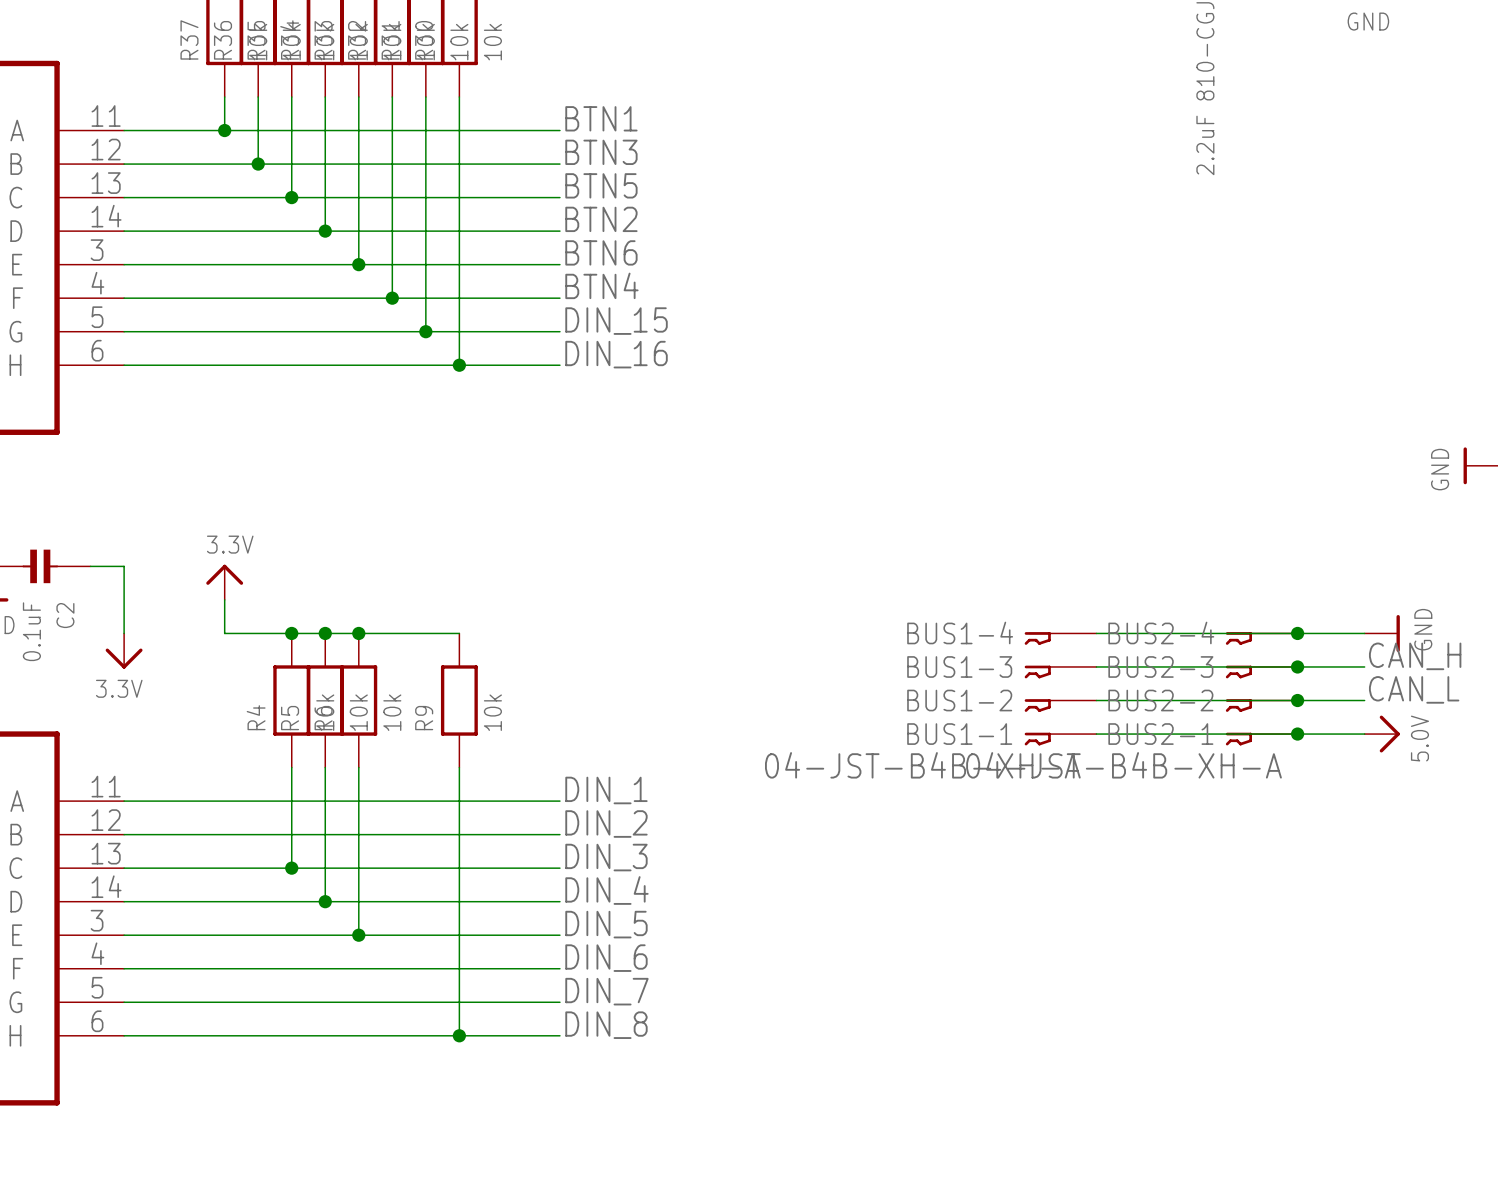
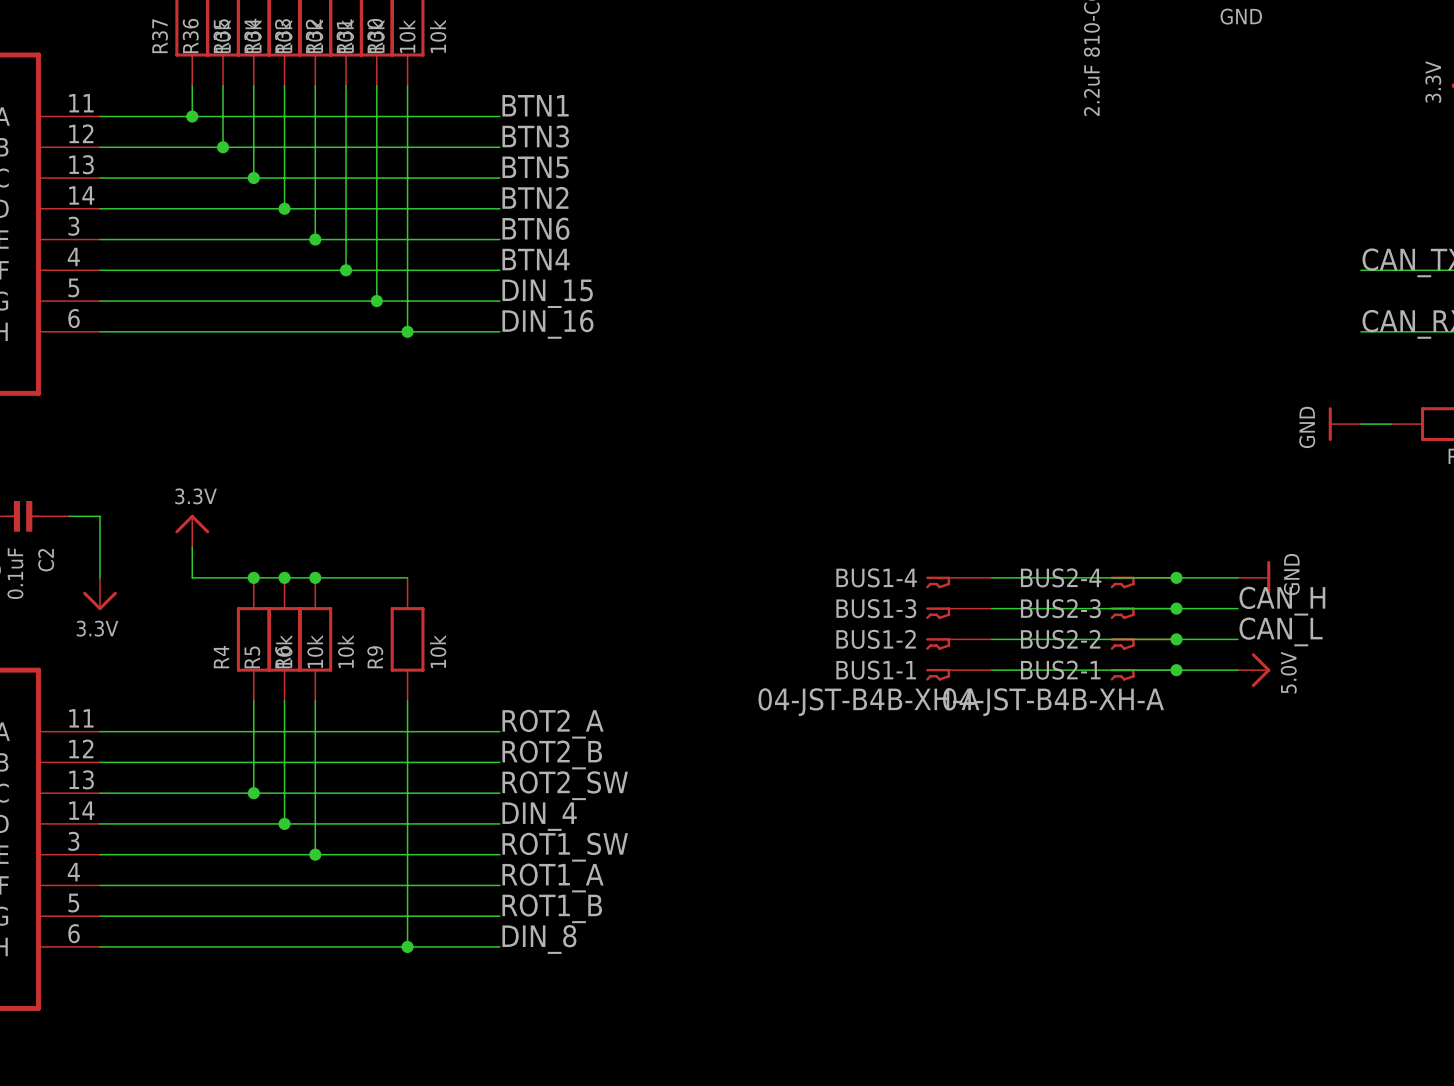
label: DIN_1 (606, 790) -> ROT2_A (553, 724)
label: DIN_2 (606, 824) -> ROT2_B (552, 754)
label: DIN_3 (606, 857) -> ROT2_SW (565, 785)
label: DIN_5 (606, 924) -> ROT1_SW (565, 847)
label: DIN_6 (606, 958) -> ROT1_A (553, 877)
label: DIN_7 (606, 991) -> ROT1_B (552, 908)

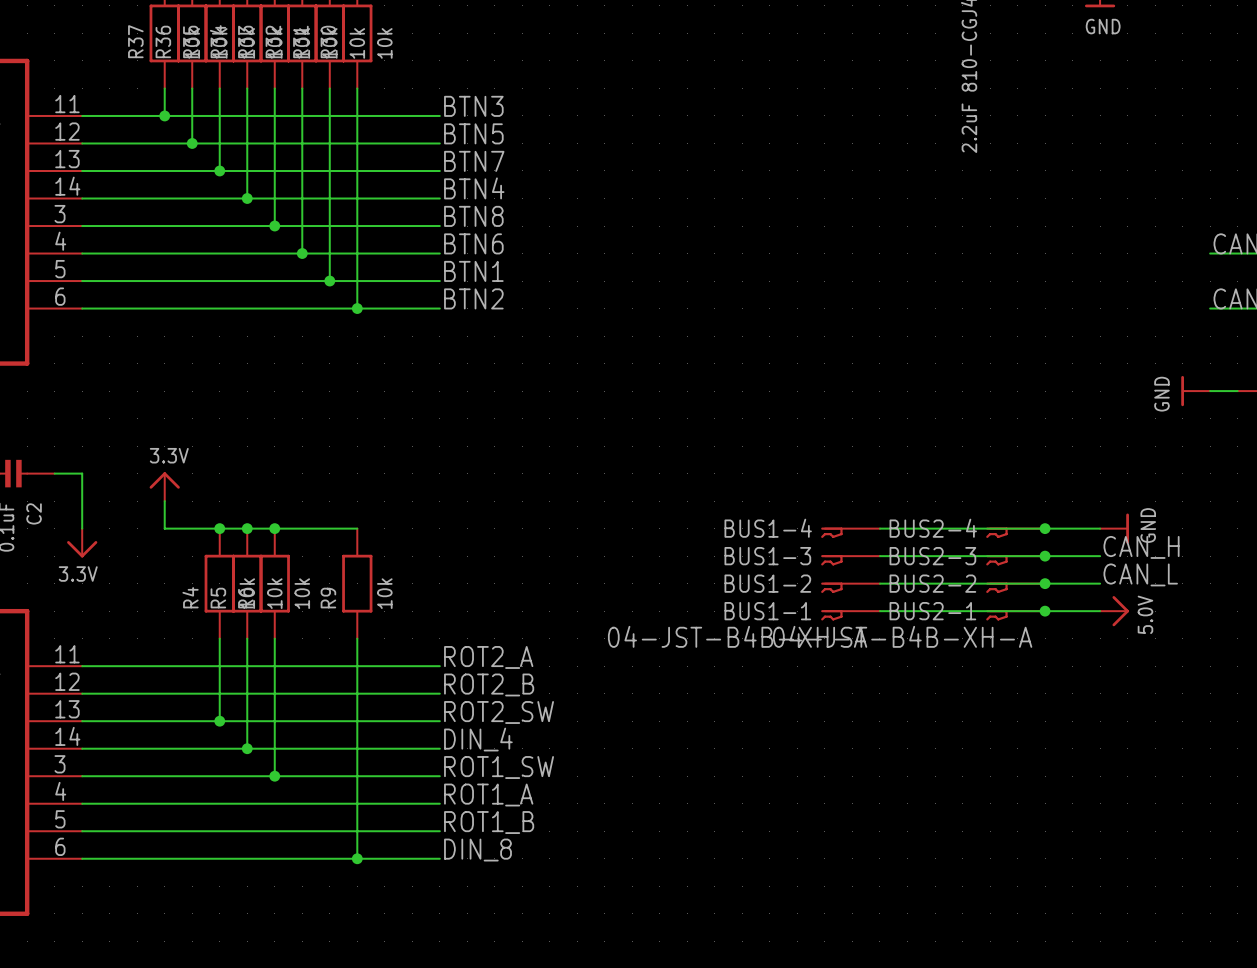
label: BTN1 (535, 105) -> BTN3 (473, 106)
label: BTN3 (535, 136) -> BTN5 (473, 133)
label: BTN5 (535, 167) -> BTN7 (474, 161)
label: BTN2 (535, 197) -> BTN4 (474, 188)
label: BTN6 (535, 228) -> BTN8 (473, 216)
label: BTN4 (536, 259) -> BTN6 (473, 243)
label: DIN_15 (547, 293) -> BTN1 (473, 271)
label: DIN_16 (547, 324) -> BTN2 (473, 298)

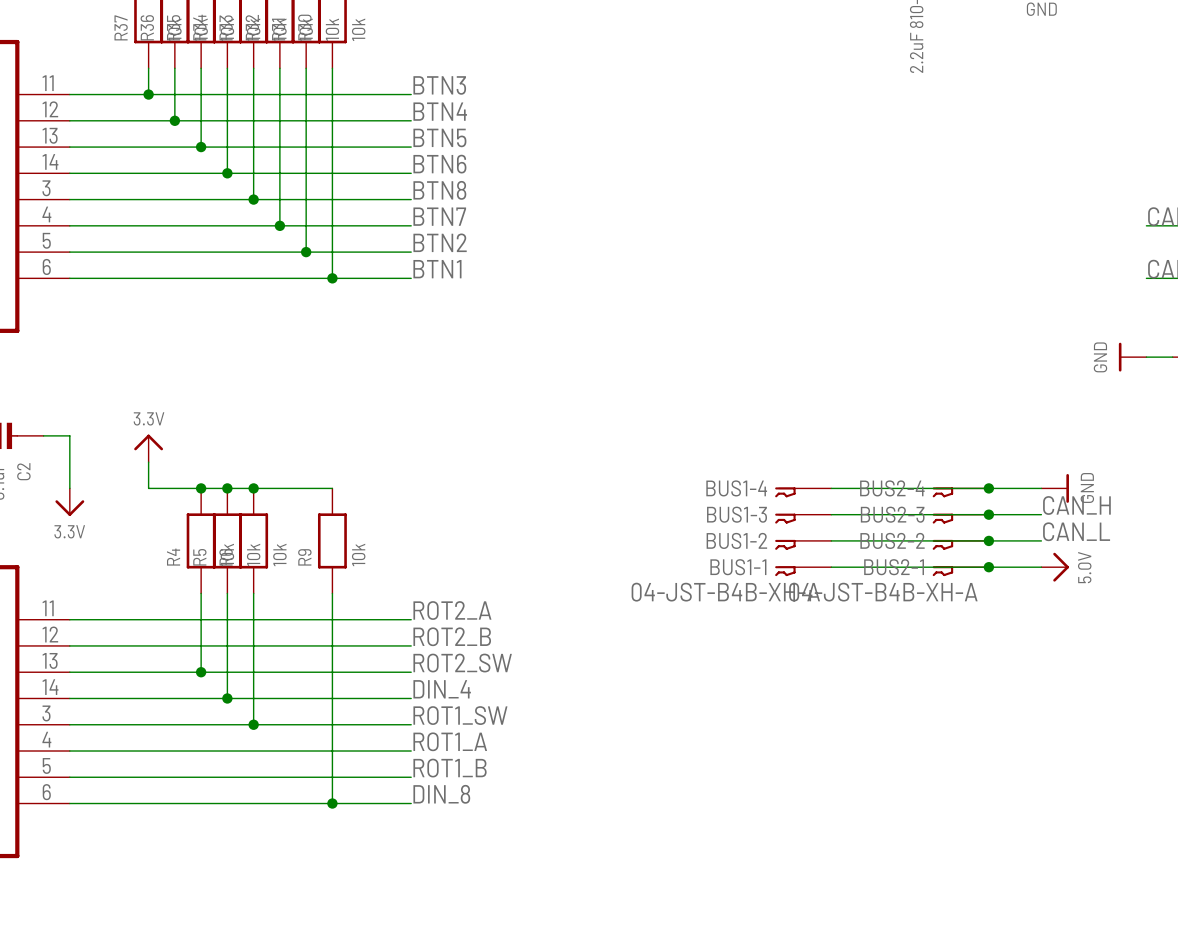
label: BTN5 (473, 133) -> BTN4 (440, 111)
label: BTN7 (474, 161) -> BTN5 (439, 137)
label: BTN4 (474, 188) -> BTN6 (439, 164)
label: BTN6 (473, 243) -> BTN7 (439, 216)
label: BTN1 (473, 271) -> BTN2 (440, 242)
label: BTN2 (473, 298) -> BTN1 (437, 269)

